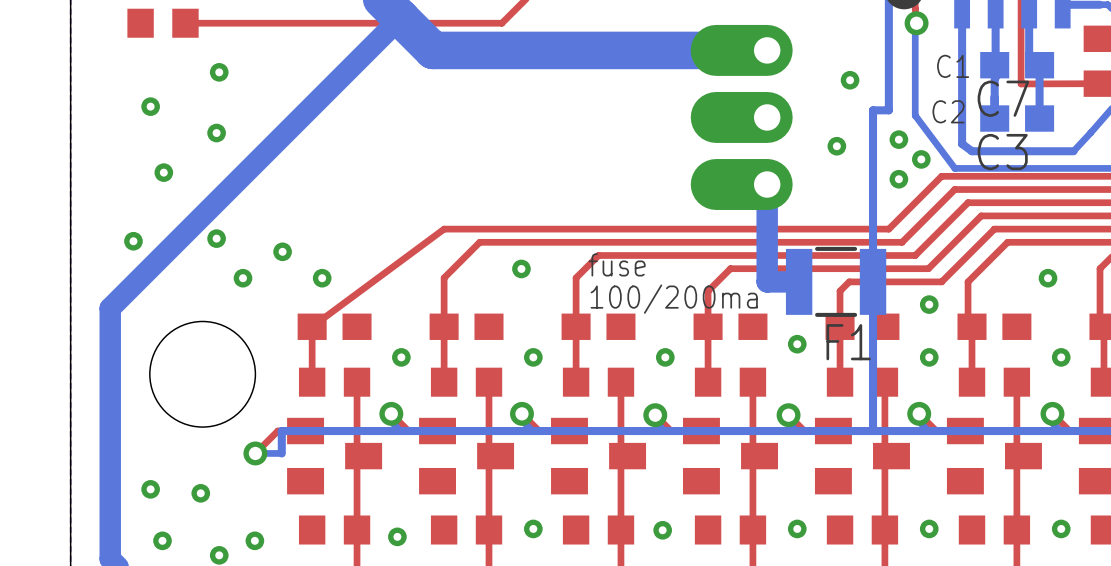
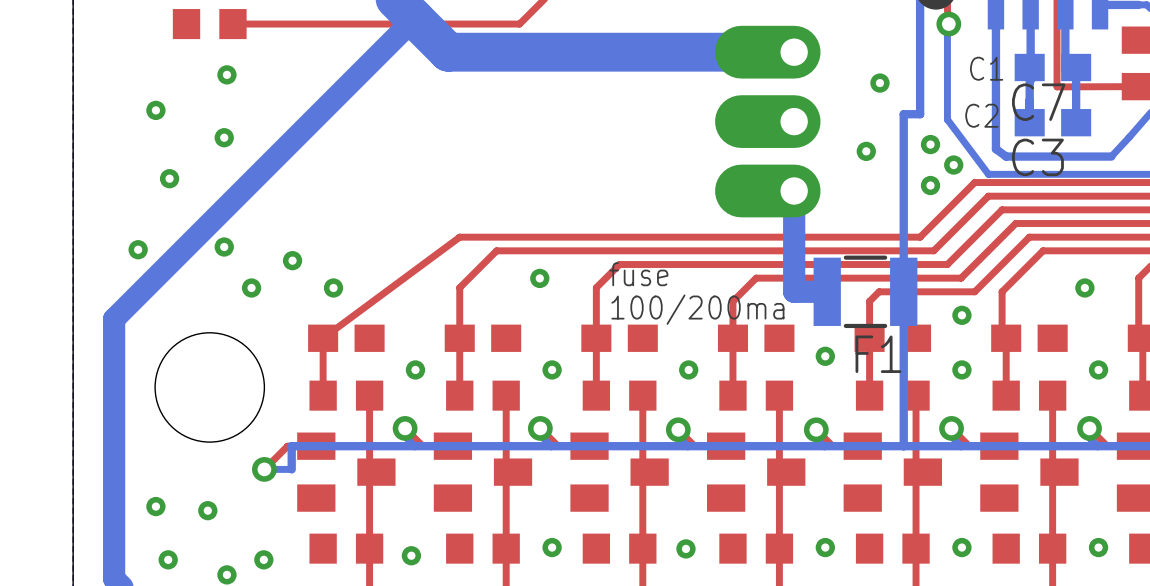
part: (163, 23) -> none
part: none -> (209, 24)
top track: (225, 23) (185, 23) -> none

